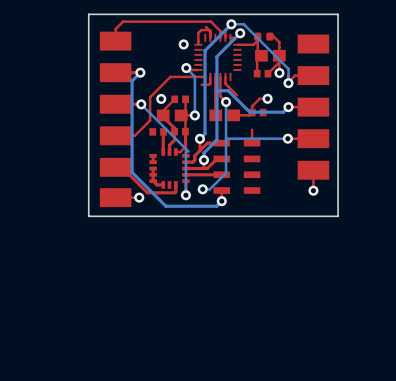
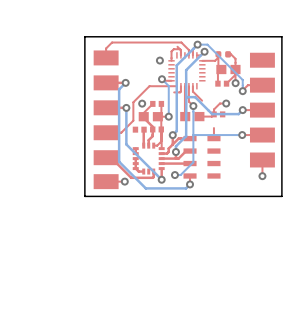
bottom track: (141, 104) (188, 151) -> (126, 107) (126, 144) (161, 179)
bottom track: (185, 151) (185, 195) -> none

